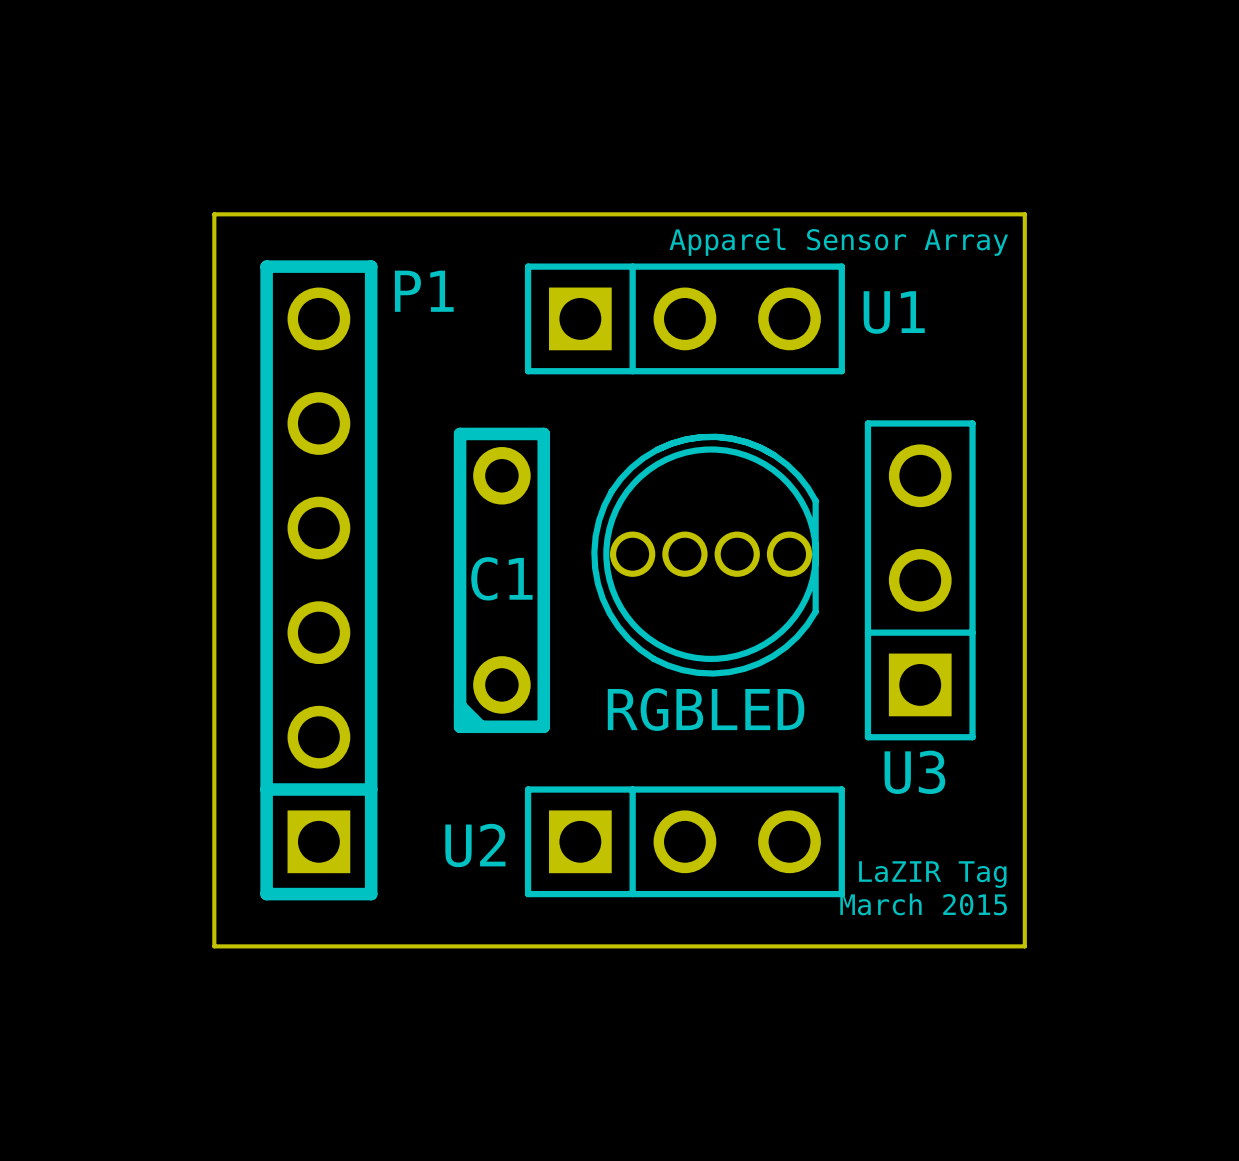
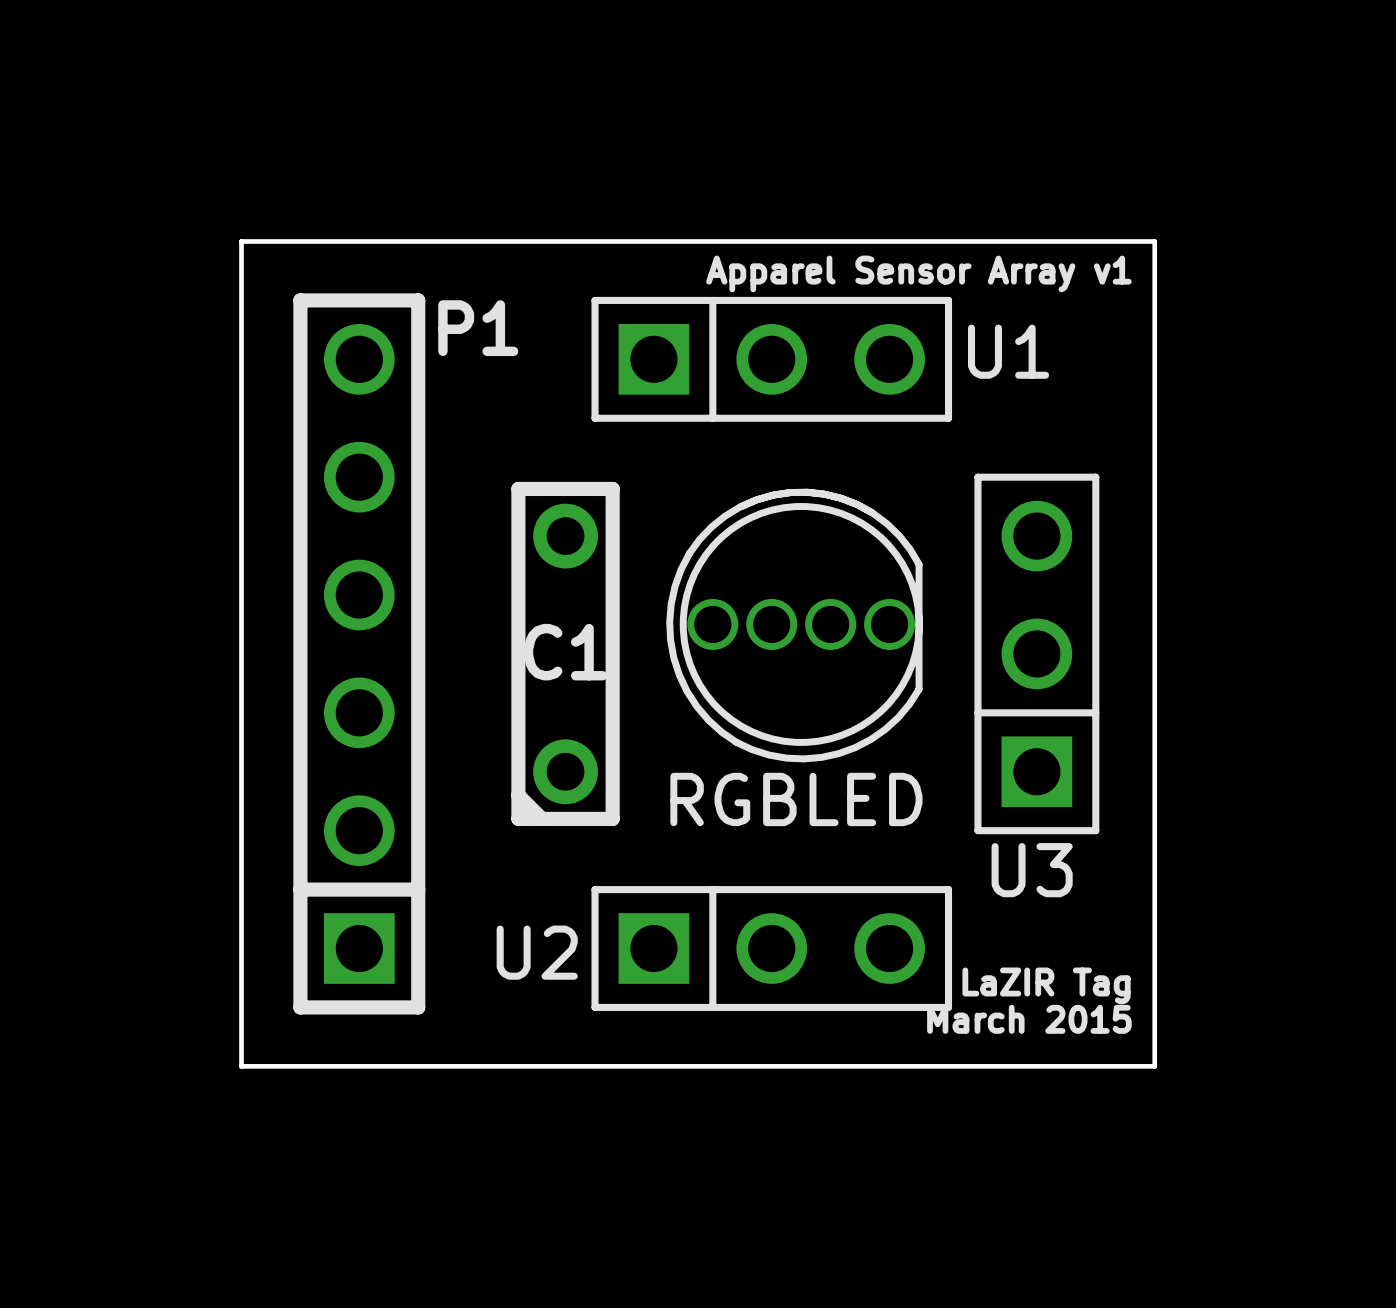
text: Apparel Sensor Array (838, 242) -> Apparel Sensor Array v1 (918, 273)

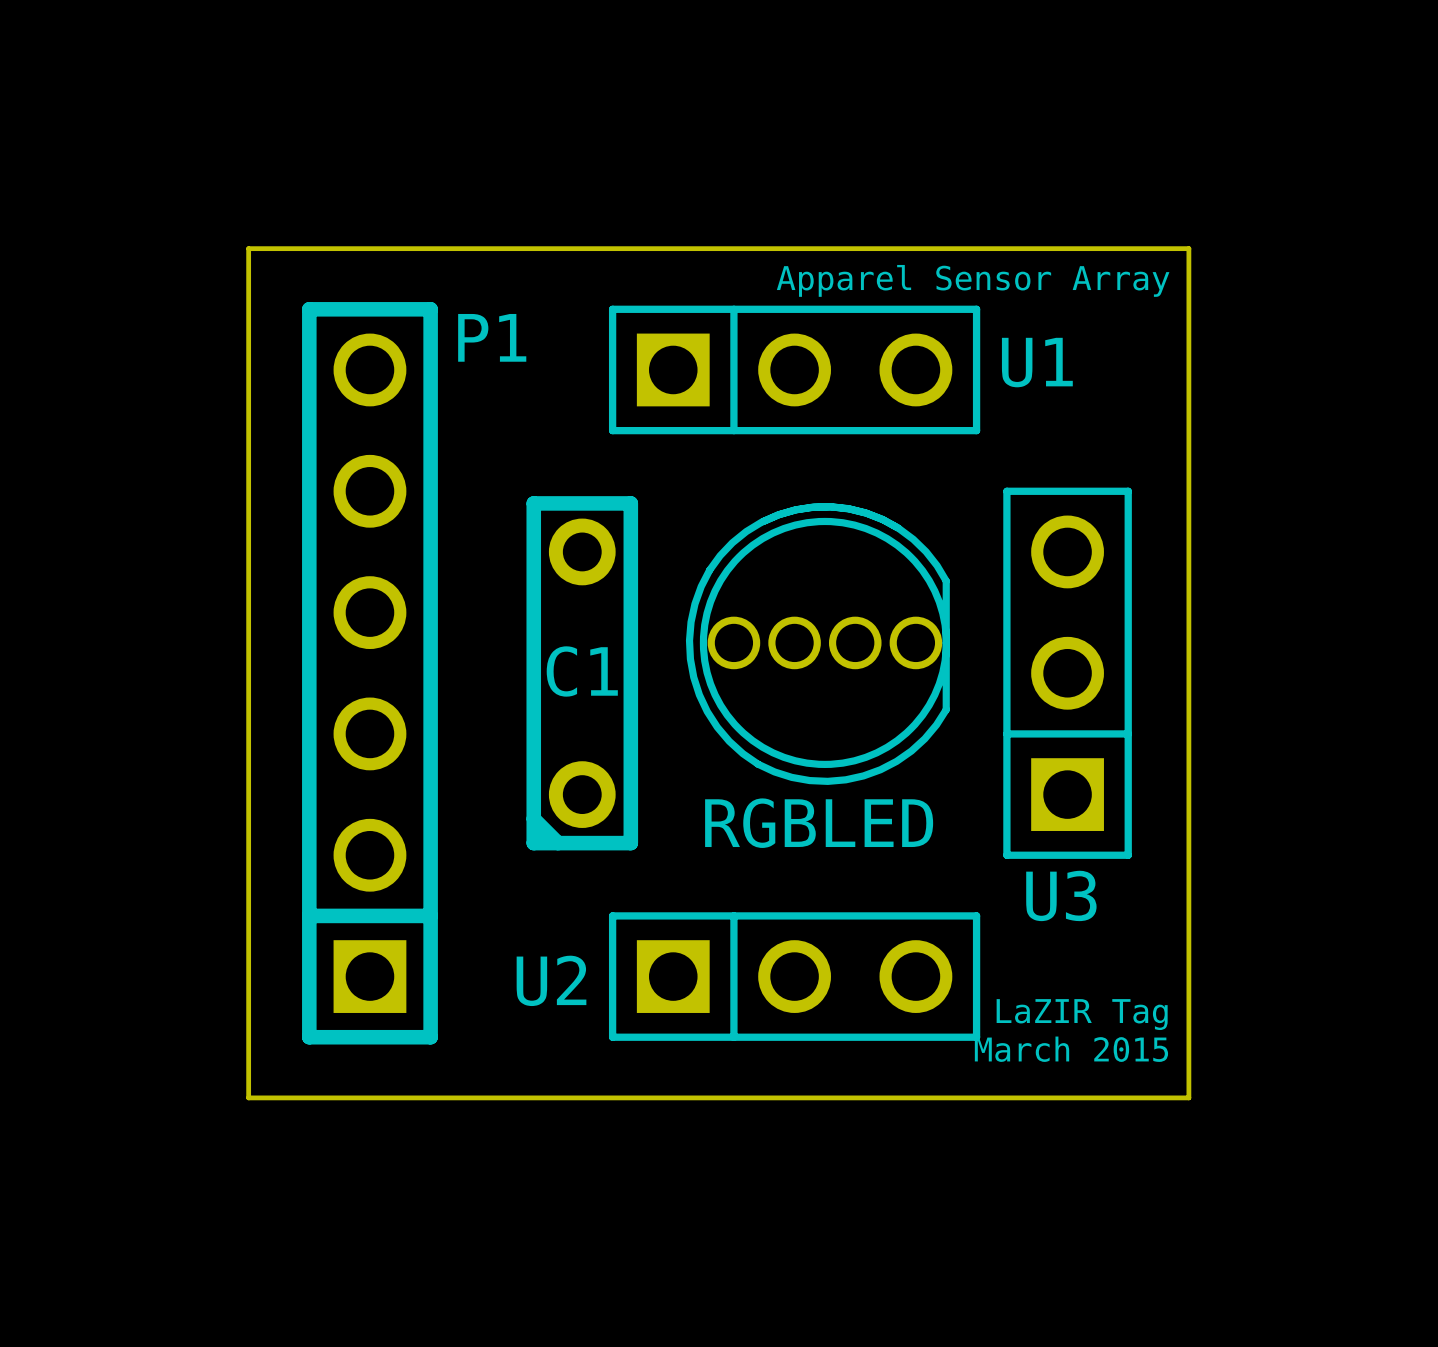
text: Apparel Sensor Array v1 (918, 273) -> Apparel Sensor Array (973, 280)

